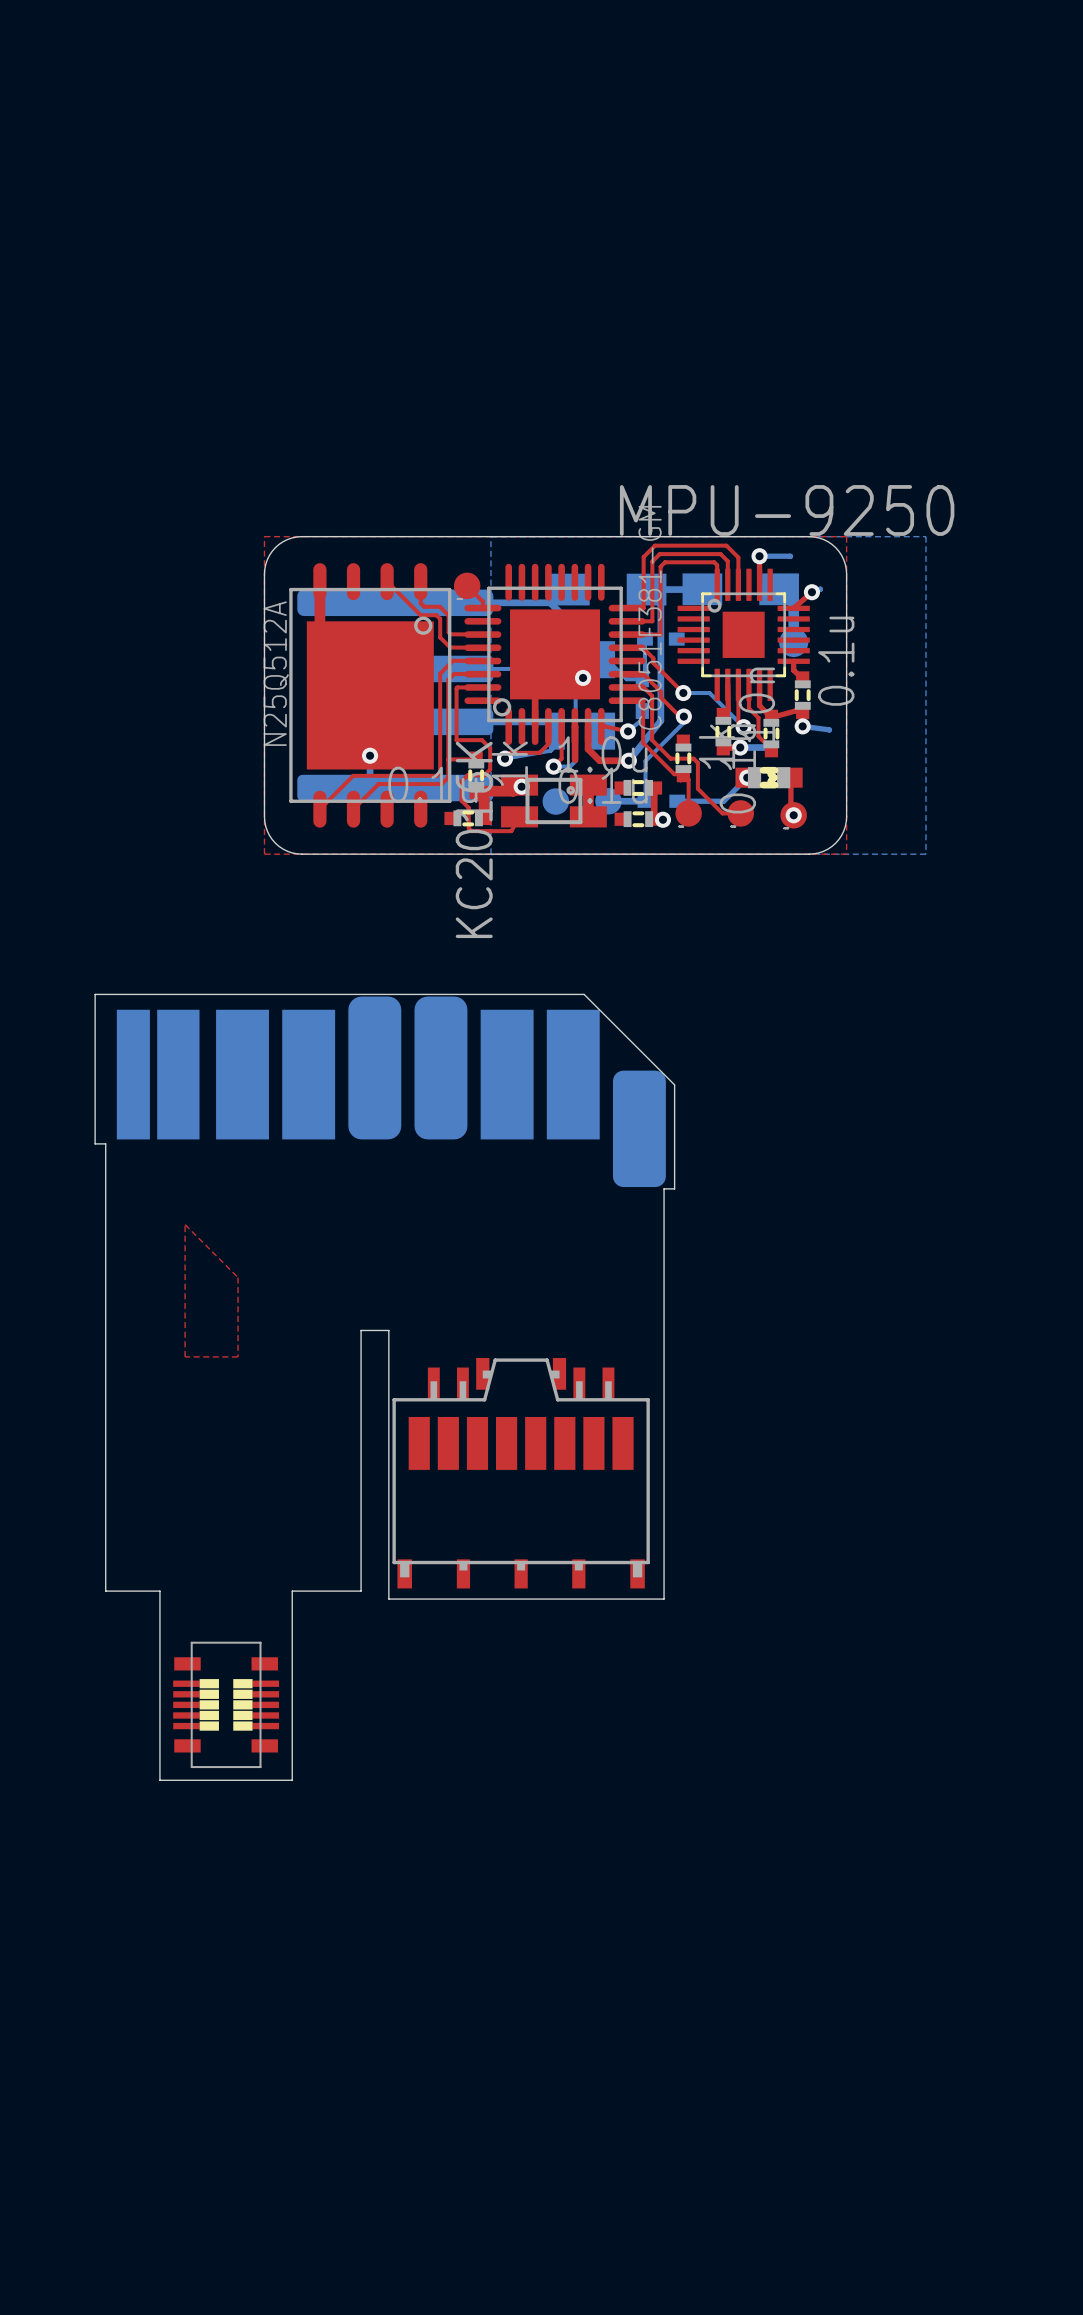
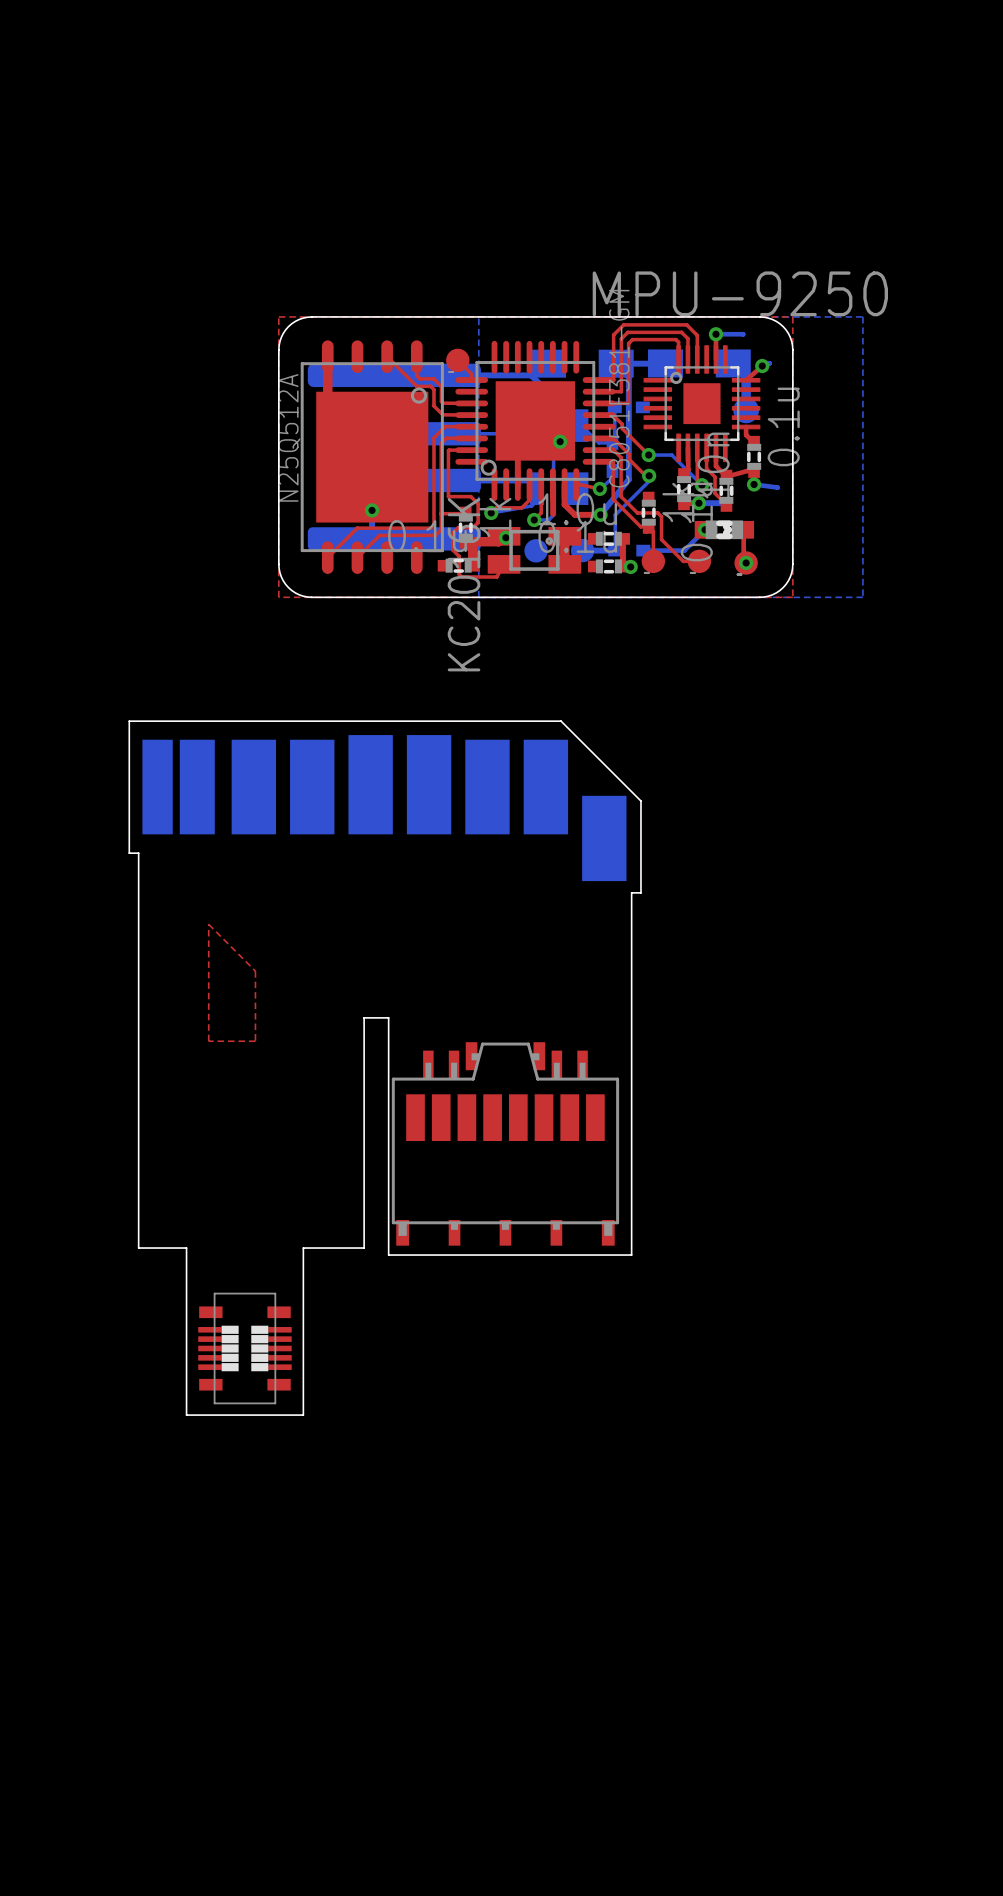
part footprint: [116, 996, 666, 1188] -> [142, 735, 627, 882]

